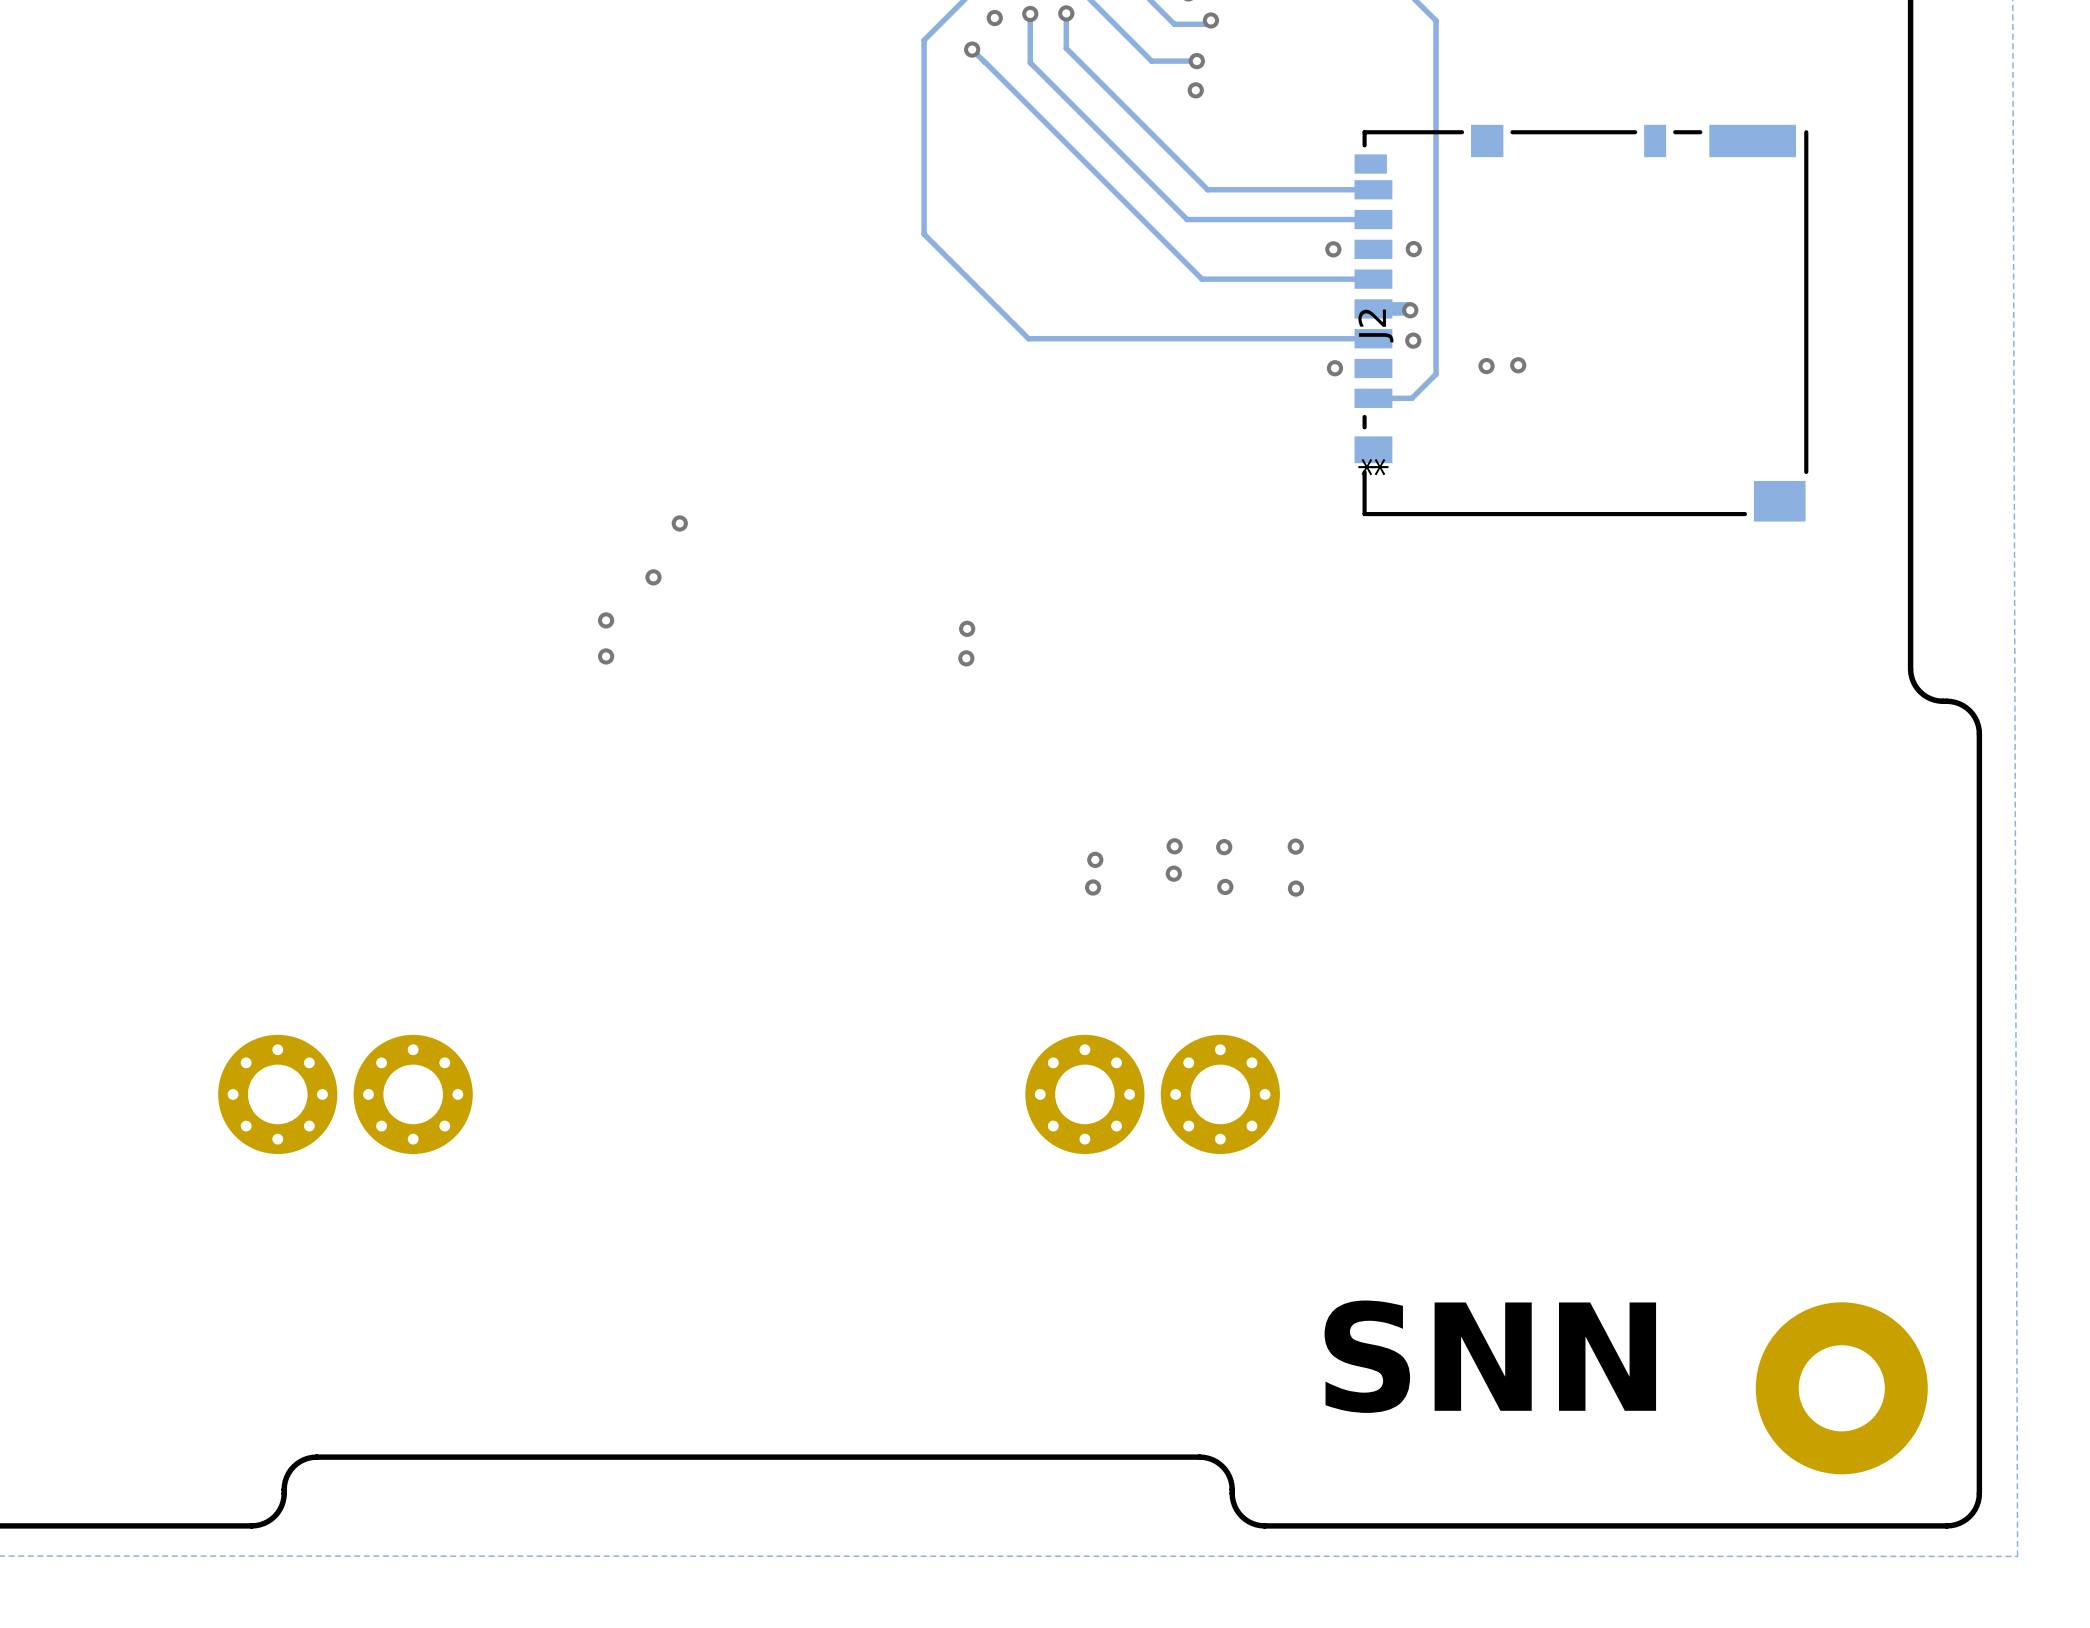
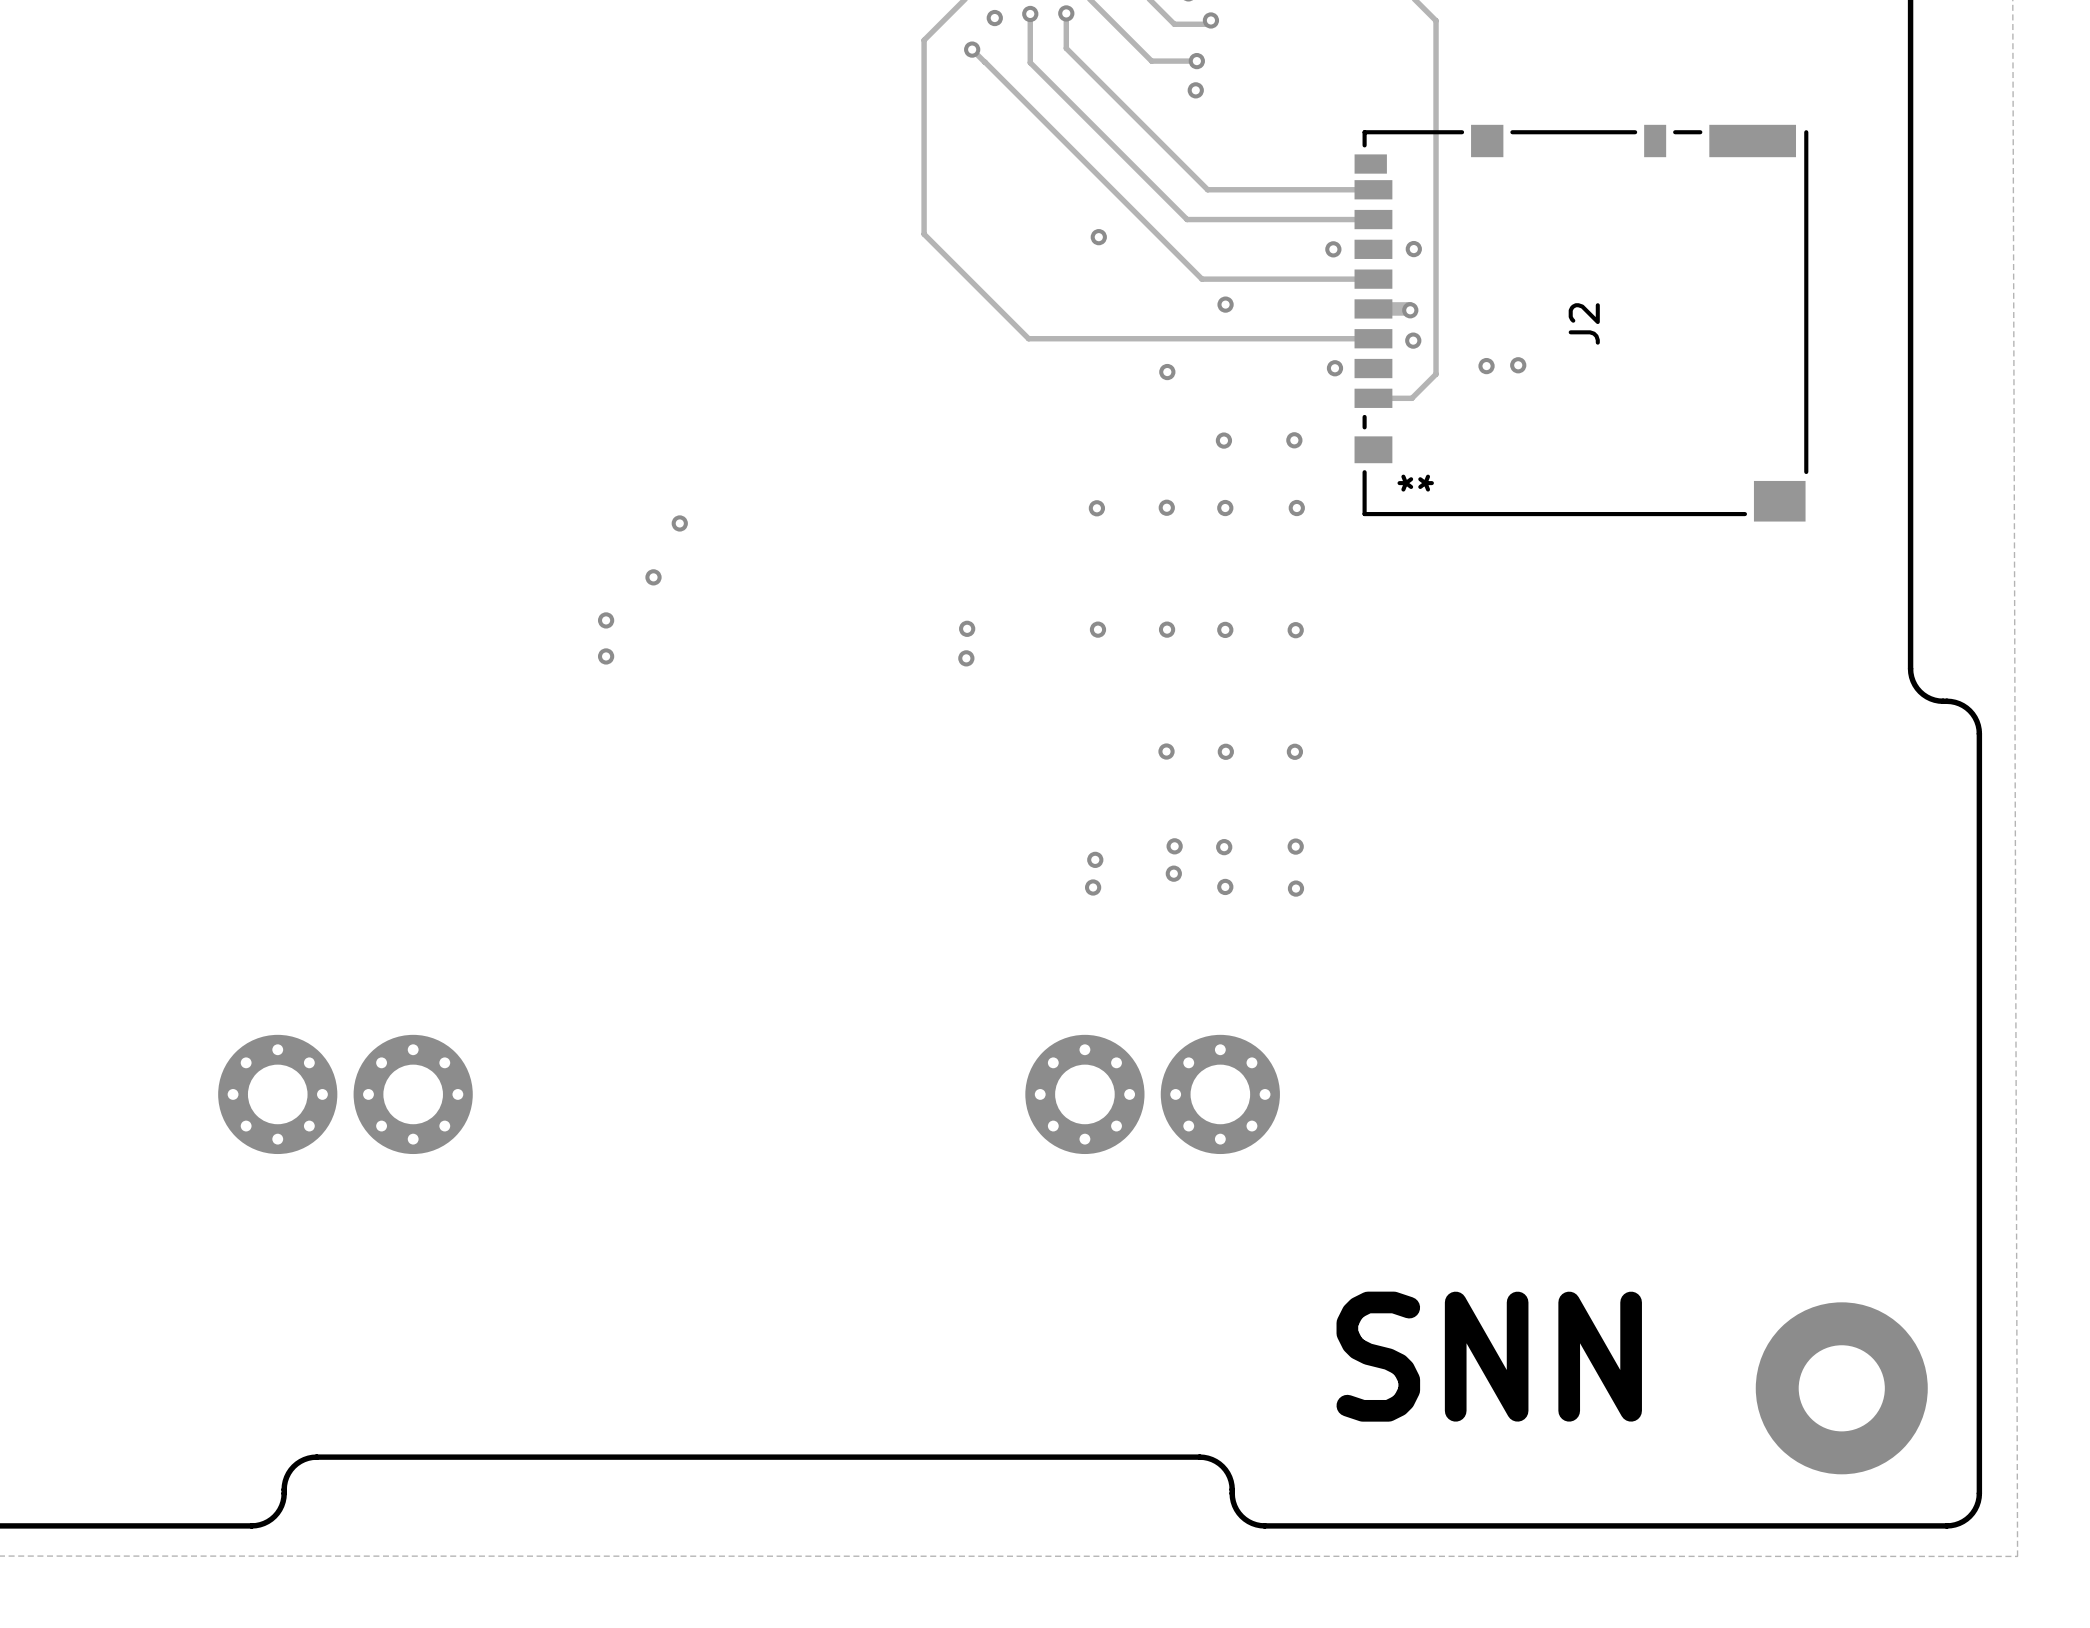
J2 footprint: [1354, 124, 1809, 522] -> [1354, 124, 1809, 522]
via: none -> (1098, 237)
via: none -> (1225, 304)
J2 name position: J2 (1375, 325) -> J2 (1584, 323)
via: none -> (1167, 372)
via: none -> (1223, 440)
via: none -> (1294, 440)
via: none -> (1166, 507)
via: none -> (1096, 508)
via: none -> (1225, 508)
via: none -> (1296, 508)
via: none -> (1097, 629)
via: none -> (1167, 629)
via: none -> (1225, 629)
via: none -> (1295, 630)
via: none -> (1166, 751)
via: none -> (1225, 751)
via: none -> (1294, 751)

